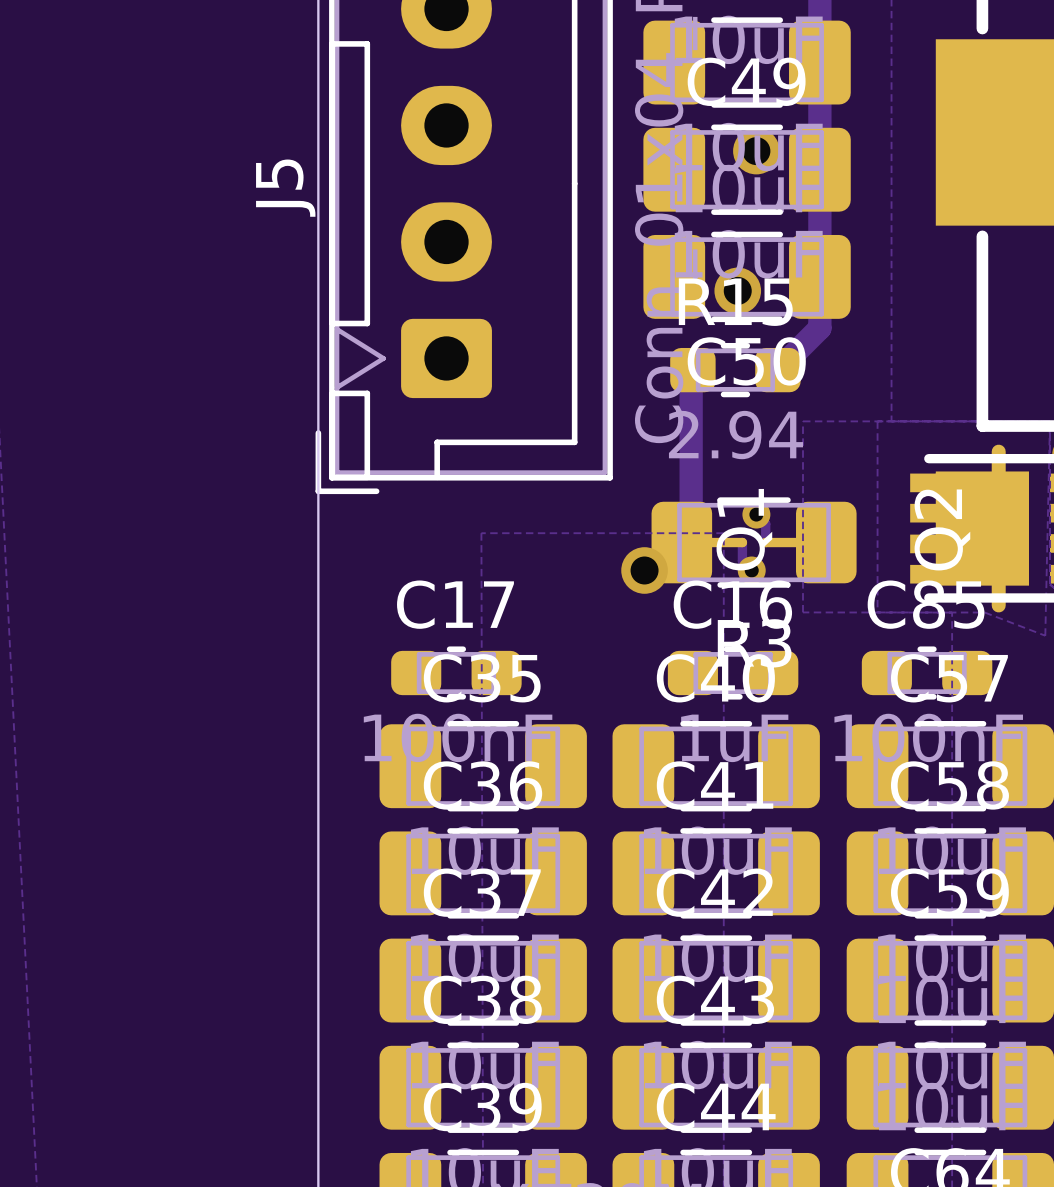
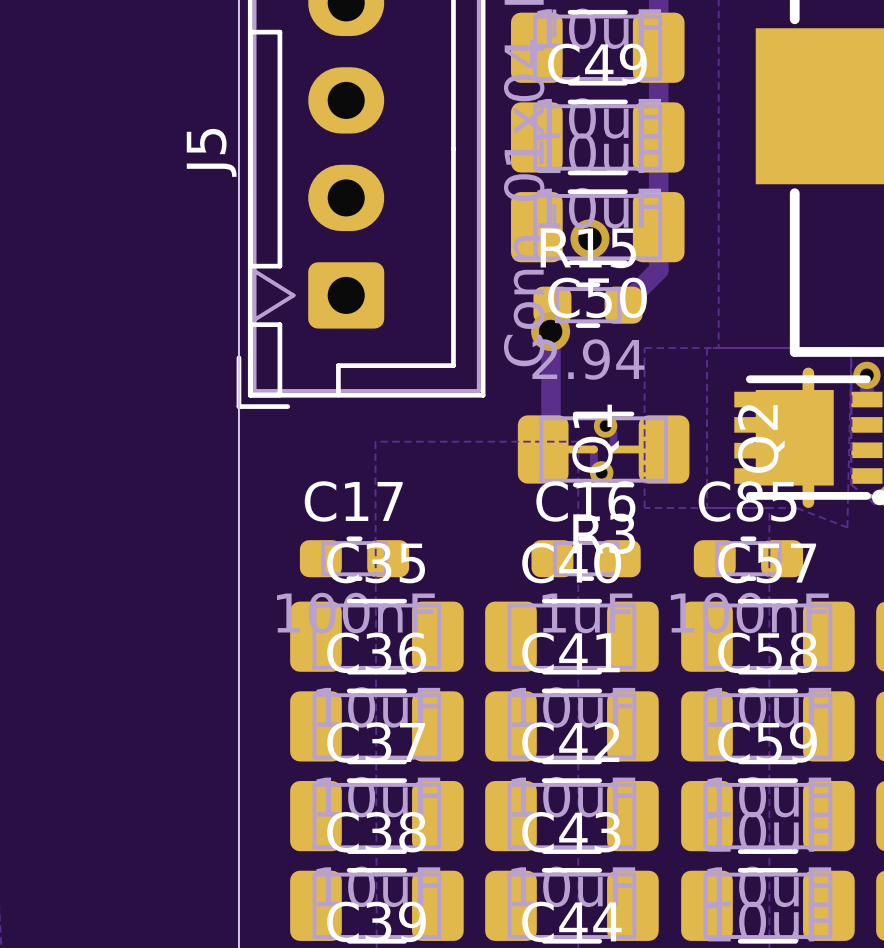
via: (756, 151) -> none
via: none -> (550, 331)
via: (644, 570) -> none

